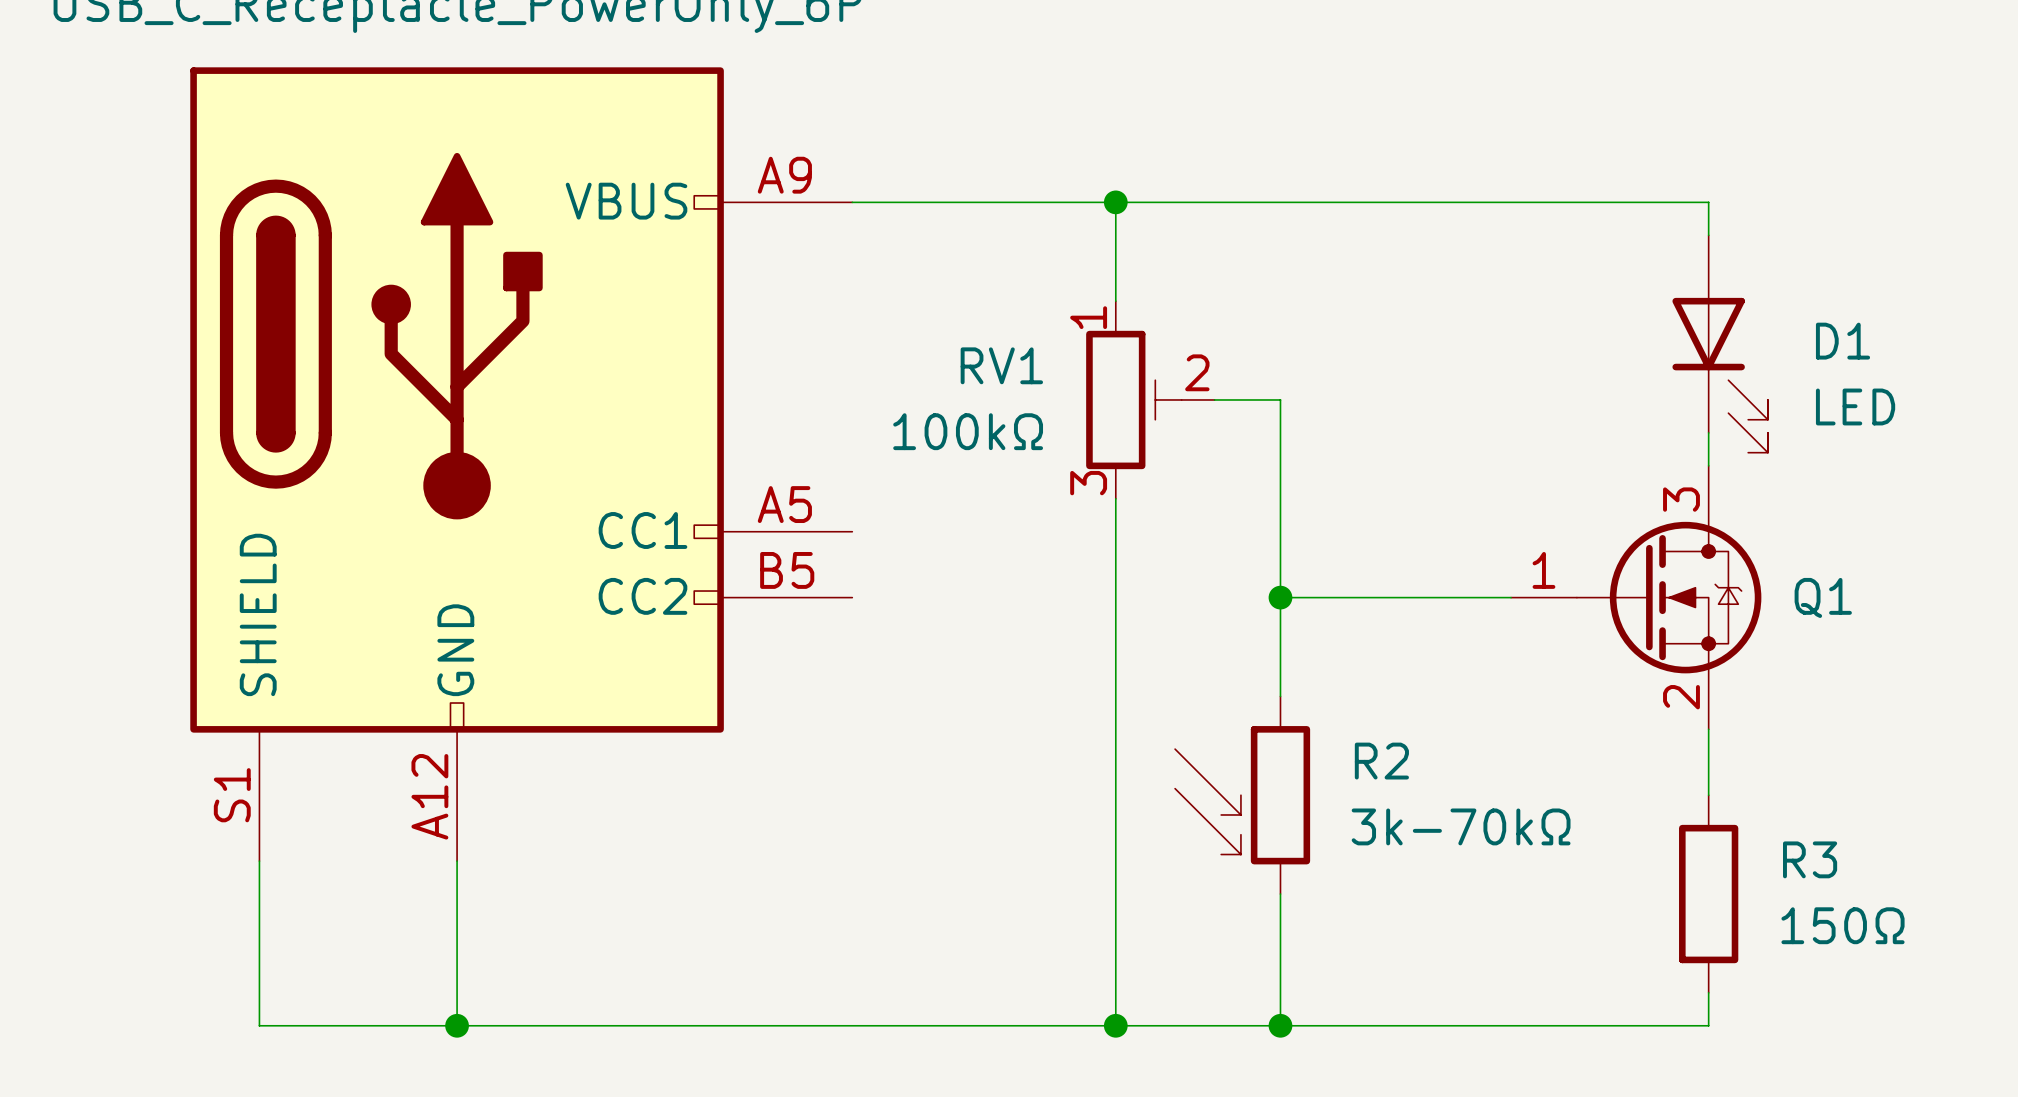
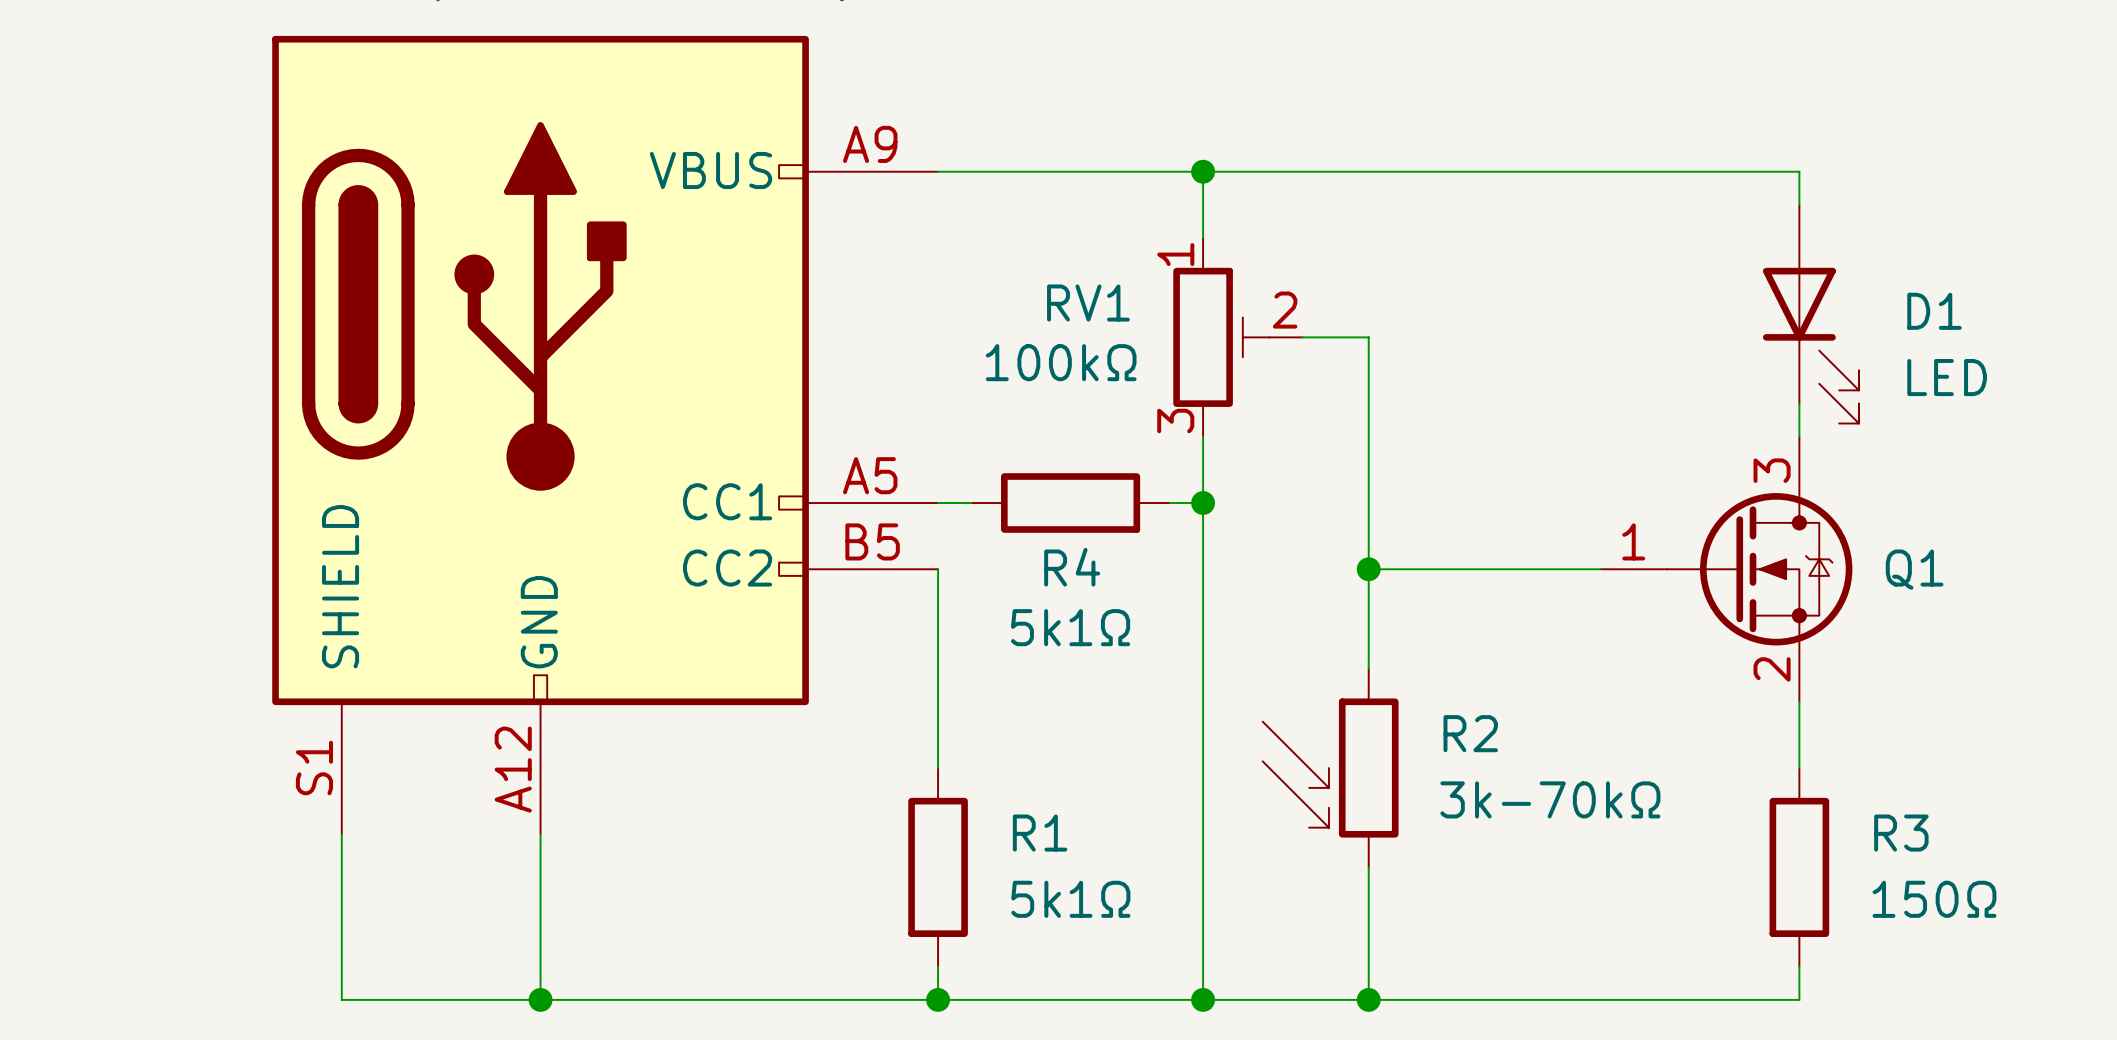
RV1 position: (1150, 399) -> (1237, 337)
wire: (1214, 399) (1280, 399) -> (1302, 337) (1368, 337) (1368, 370)
RV1 value position: 100kΩ (968, 431) -> 100kΩ (1061, 362)
wire: none -> (938, 503) (971, 503)
R4: none -> 5k1Ω (1070, 503)
wire: none -> (1169, 503) (1203, 503)
junction: none -> (1203, 503)
wire: none -> (938, 569) (938, 768)
R1: none -> 5k1Ω (938, 867)
wire: none -> (938, 966) (938, 999)
junction: none -> (938, 999)

